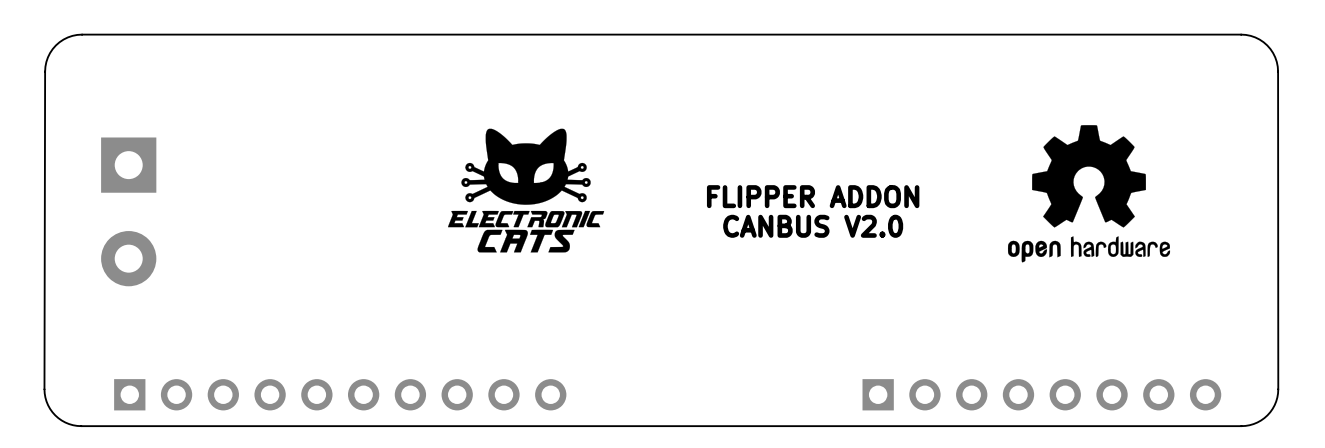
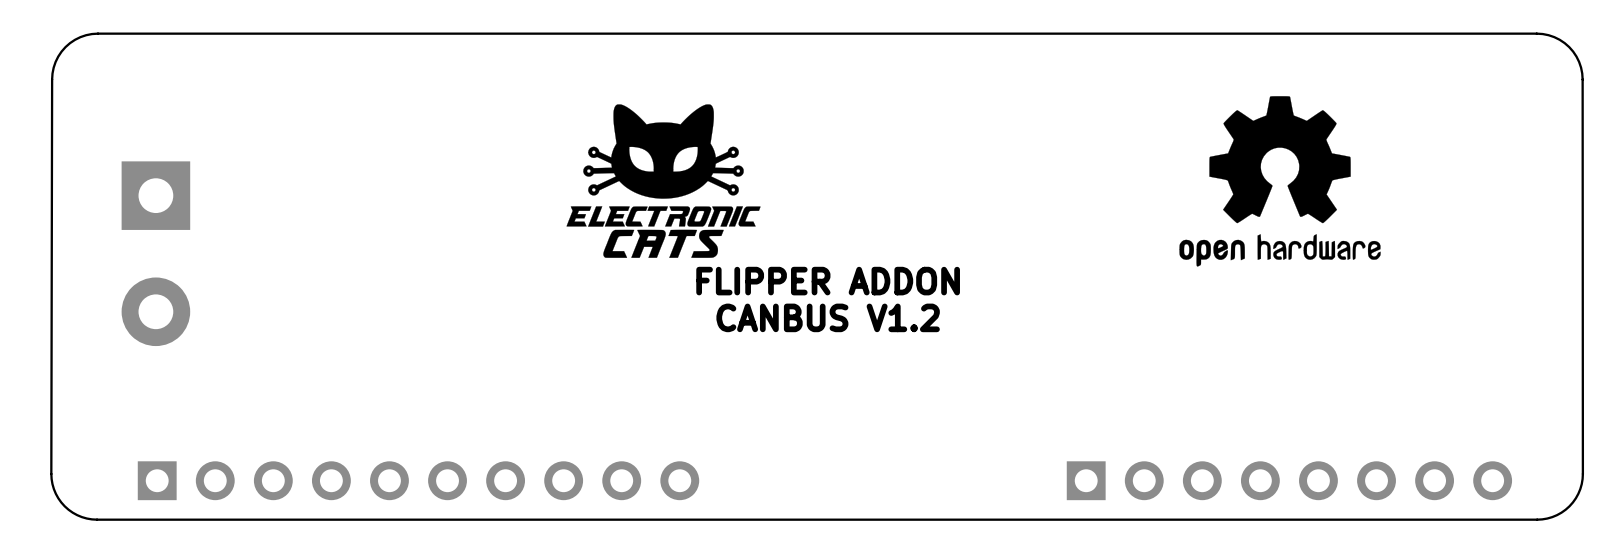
drawing position: (526, 190) -> (663, 181)
drawing position: (1089, 193) -> (1280, 181)
text position: FLIPPER ADDON (813, 196) -> FLIPPER ADDON (828, 281)
text: CANBUS V2.0 (813, 226) -> CANBUS V1.2 (828, 317)

